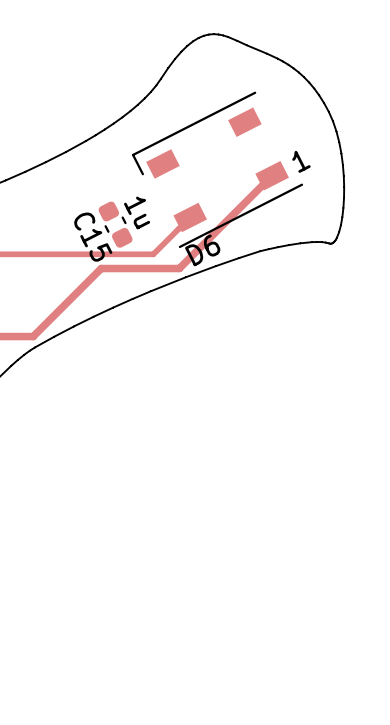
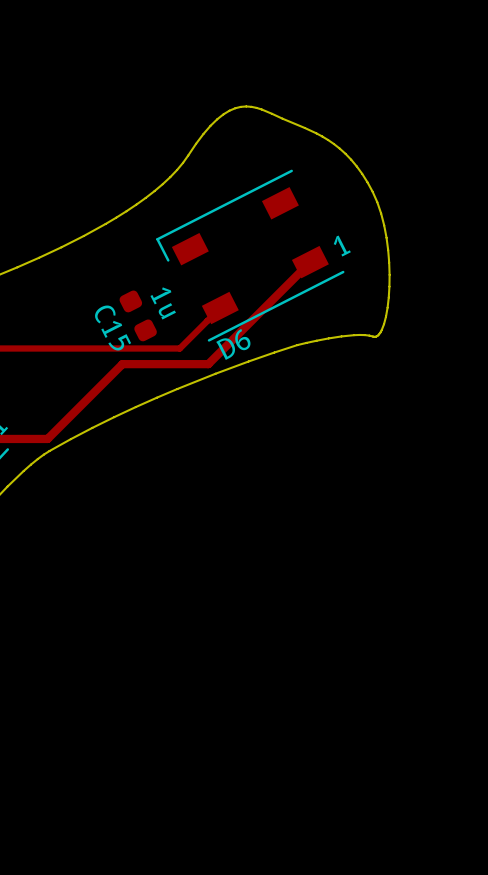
C15 footprint: [98, 201, 133, 248] -> [119, 290, 157, 342]

